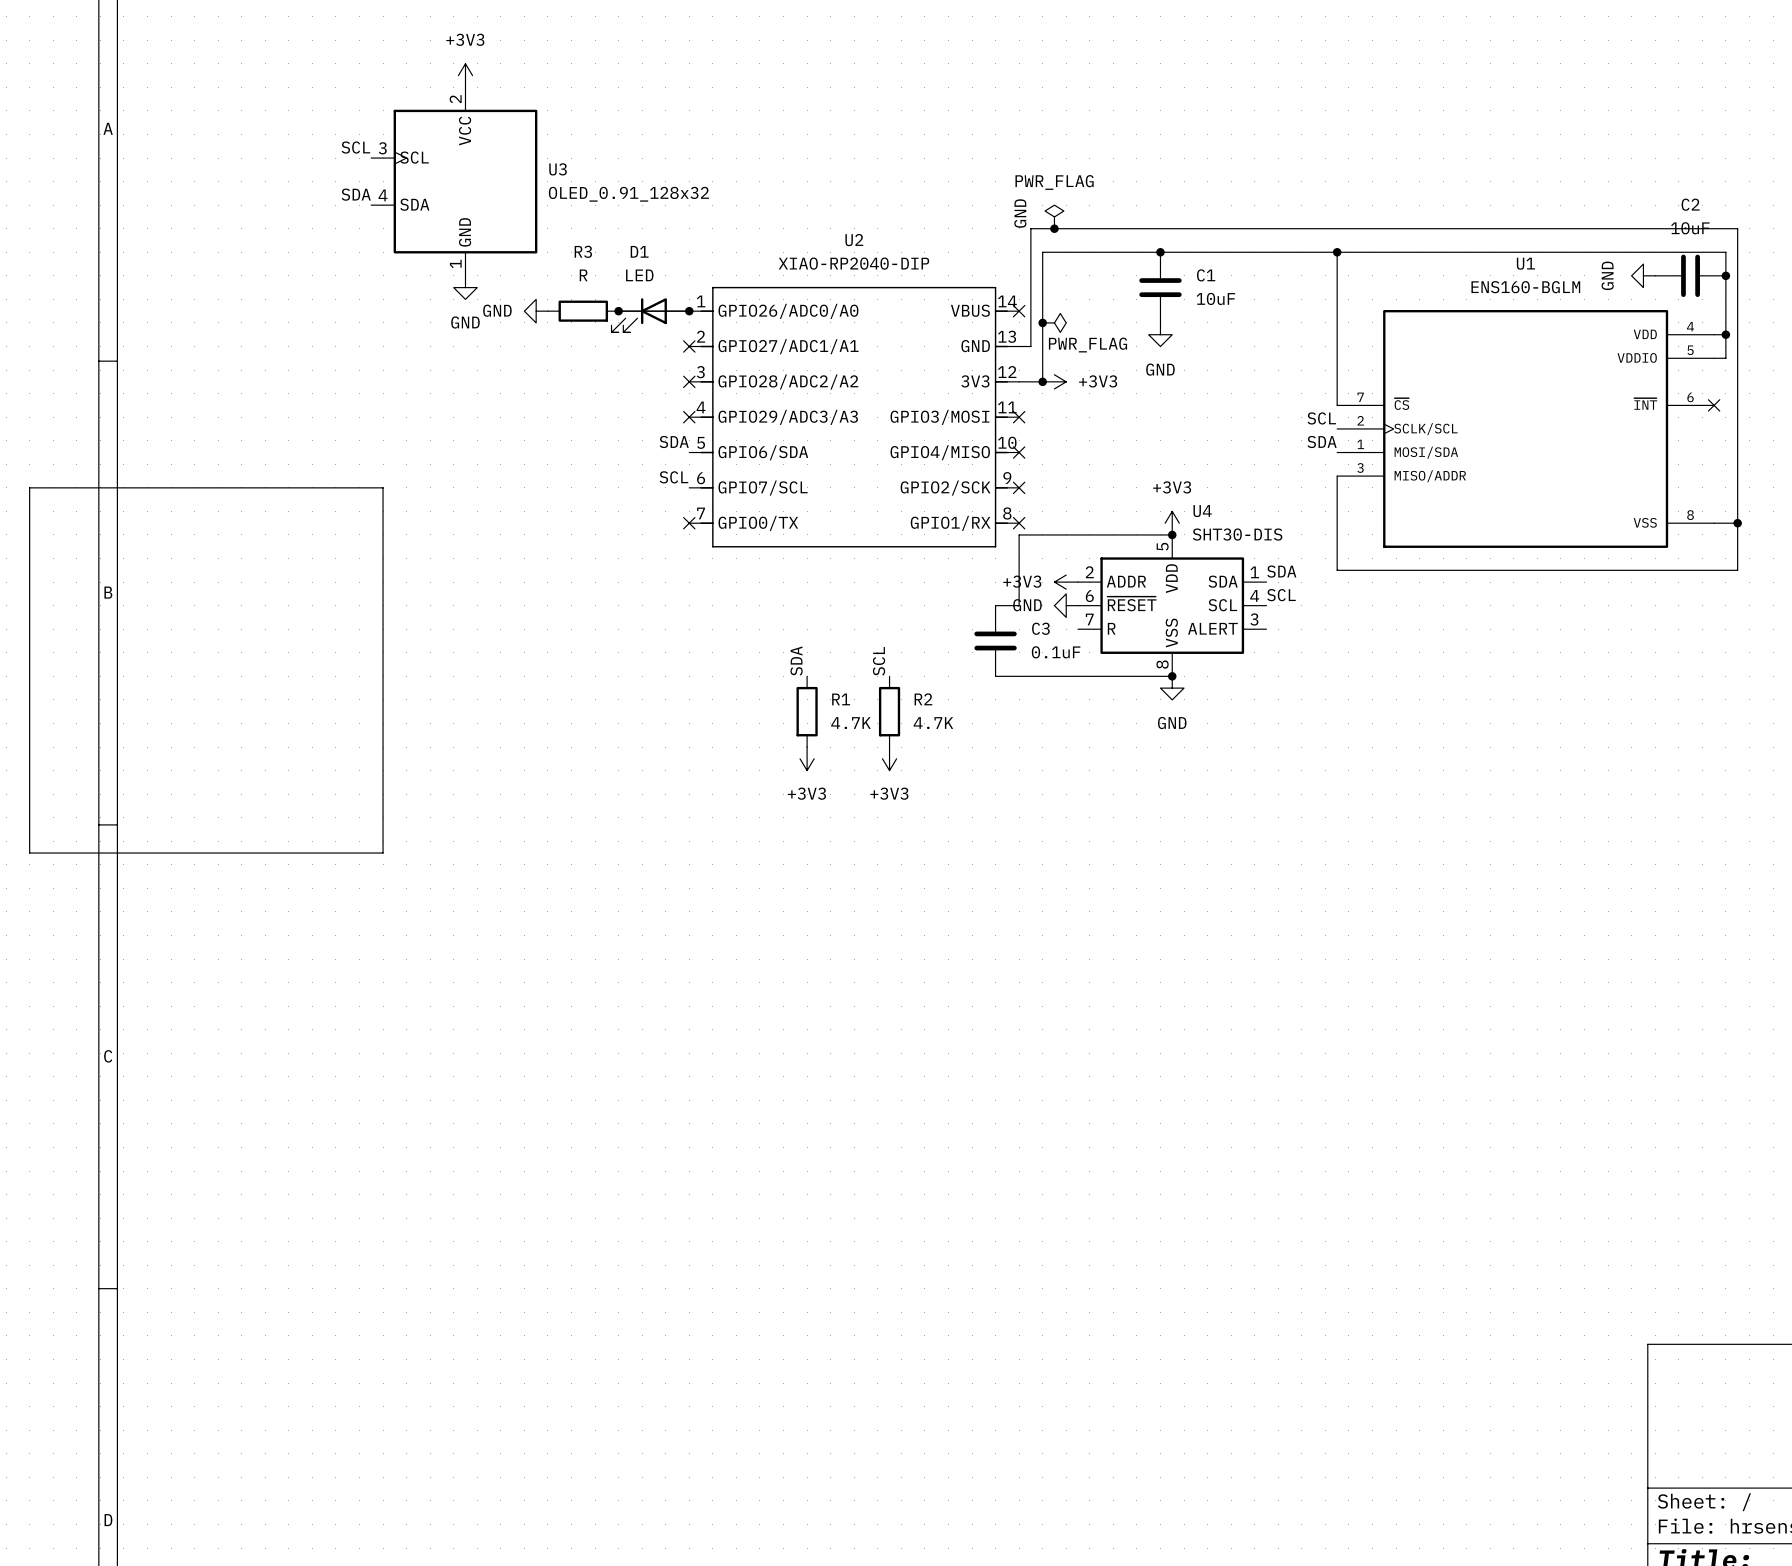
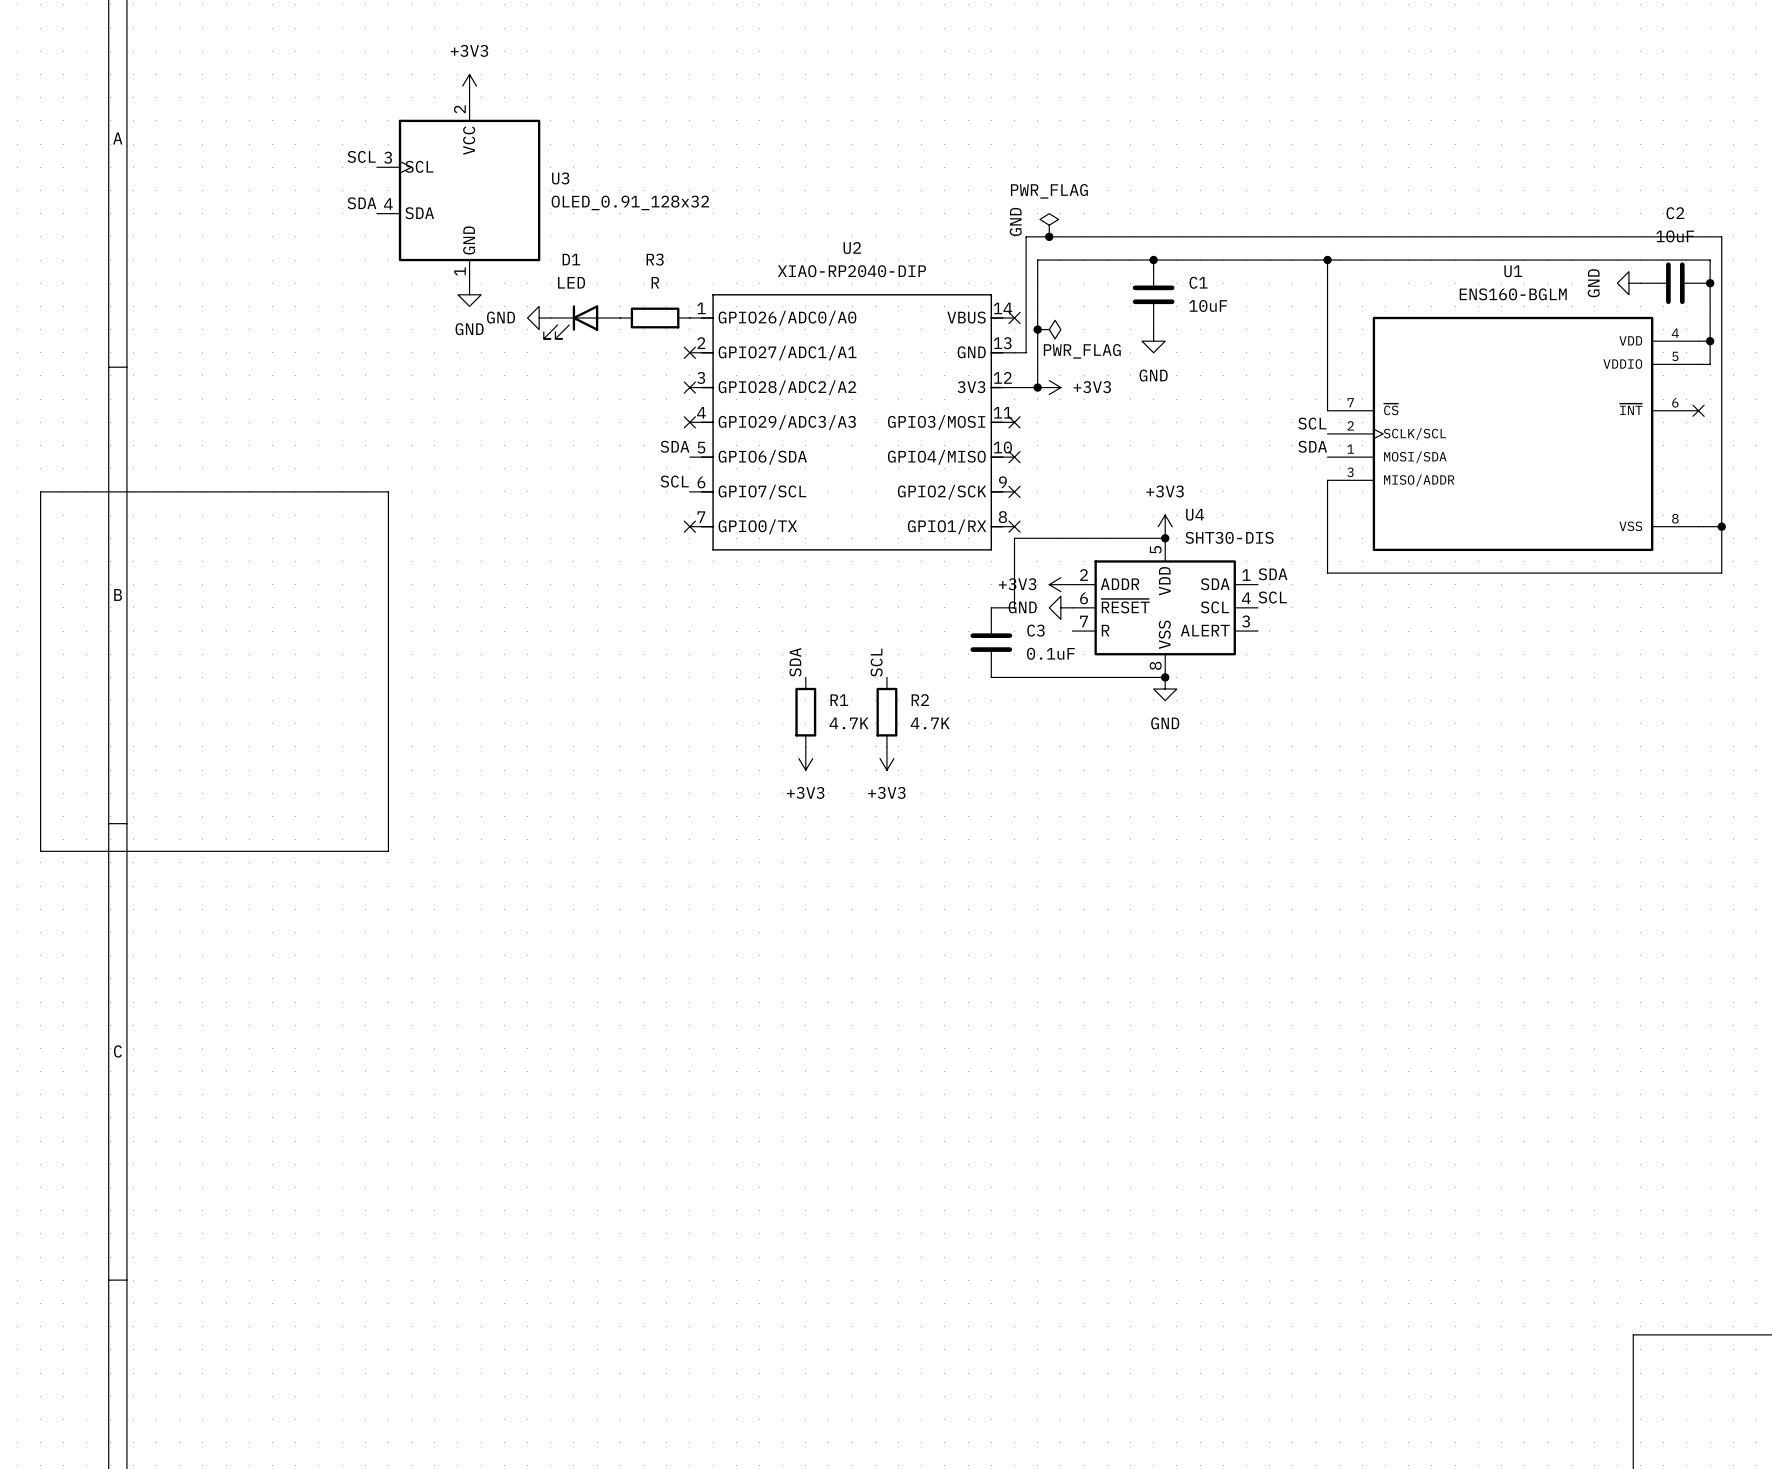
R3 position: (583, 311) -> (655, 318)
wire: (618, 311) (689, 311) -> none
junction: (618, 311) -> none
junction: (689, 311) -> none
D1 position: (650, 315) -> (582, 322)

